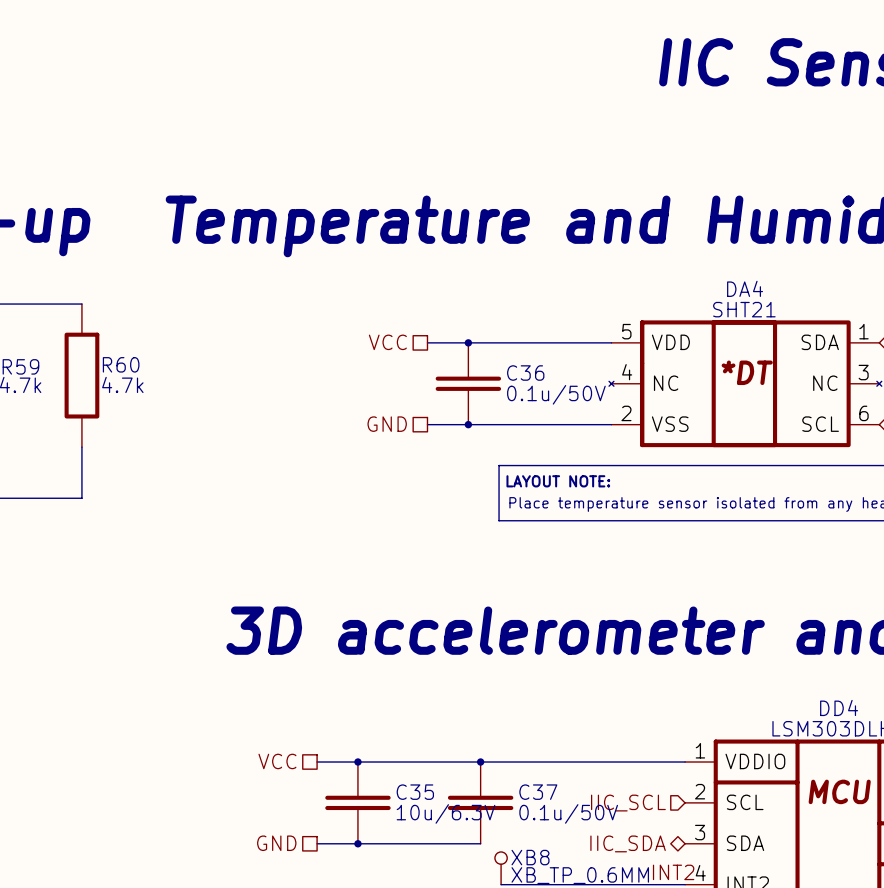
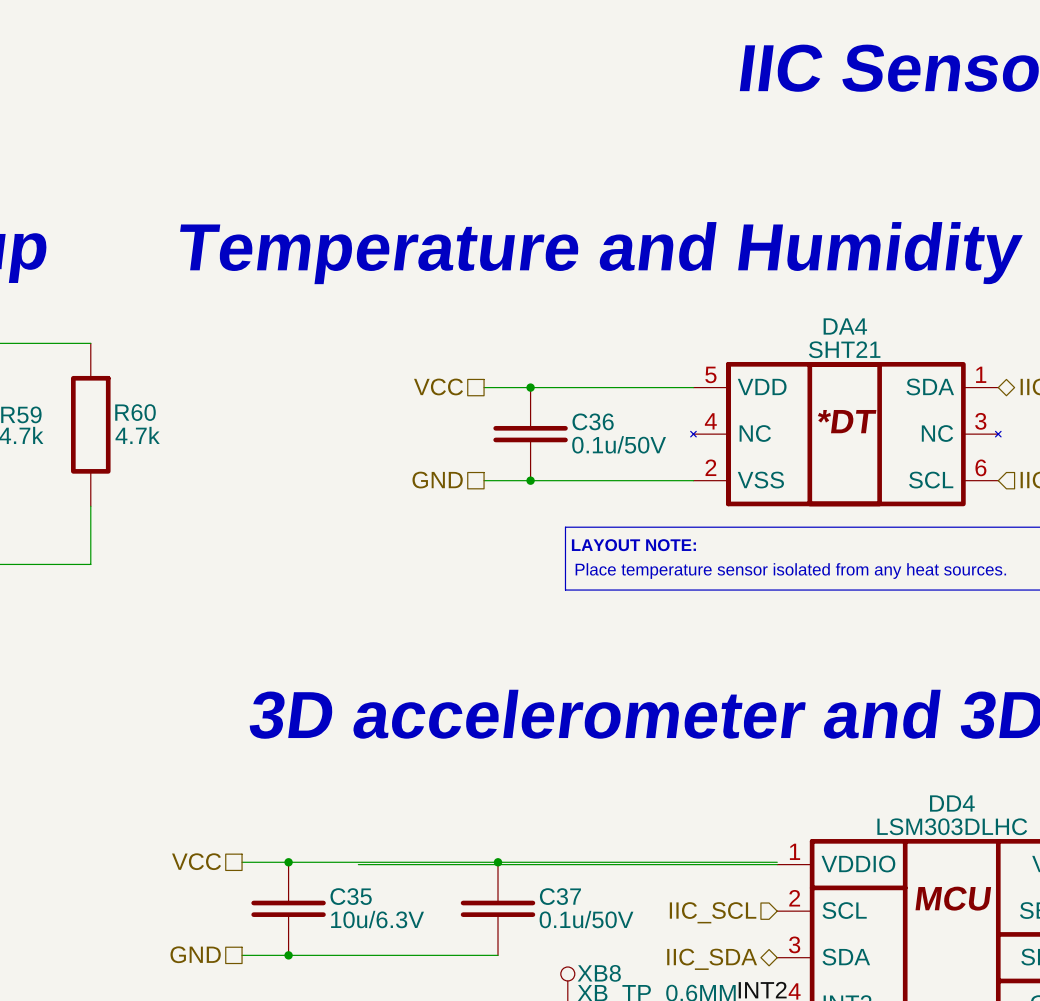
wire: none -> (242, 862) (777, 862)
junction: none -> (288, 862)
junction: none -> (498, 862)
hierarchical label position: VCC (277, 761) -> VCC (196, 861)
junction: (357, 762) -> none
junction: (480, 762) -> none
C35 position: (357, 802) -> (288, 908)
C37 position: (480, 802) -> (498, 908)
wire: none -> (242, 955) (498, 955)
junction: none -> (288, 955)
hierarchical label position: GND (276, 843) -> GND (195, 954)
wire: (317, 843) (480, 843) -> none
junction: (357, 843) -> none

